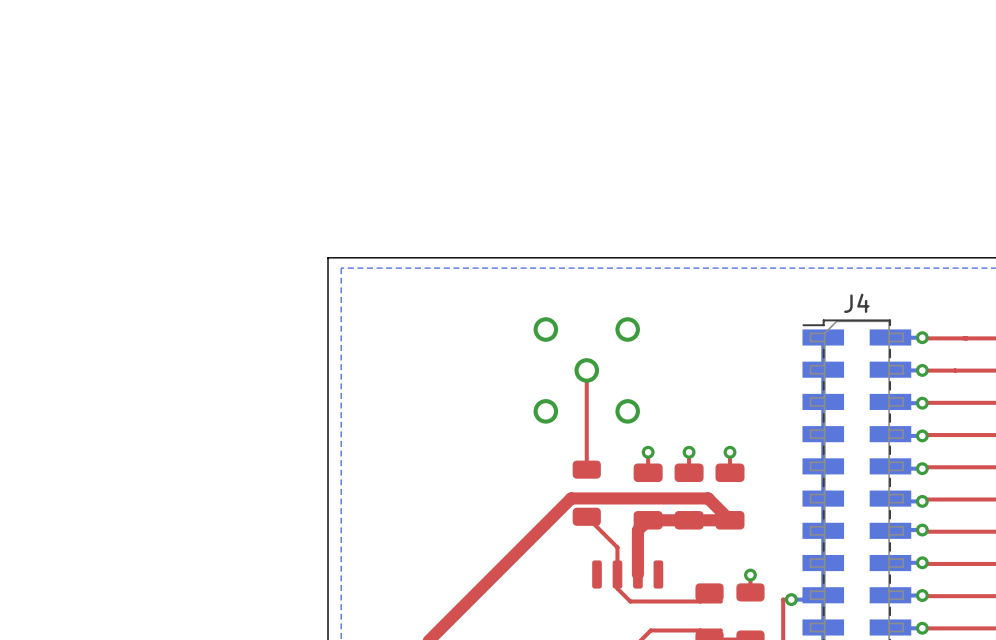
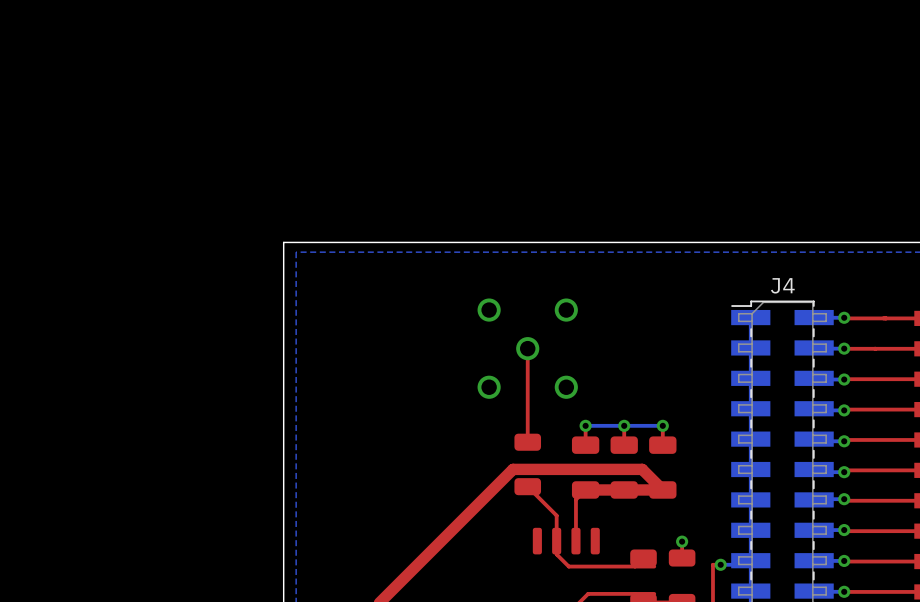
bottom track: none -> (662, 425) (585, 425)
top track width: thick (648, 520) (637, 530) (637, 574) -> thin (585, 489) (575, 499) (575, 541)

